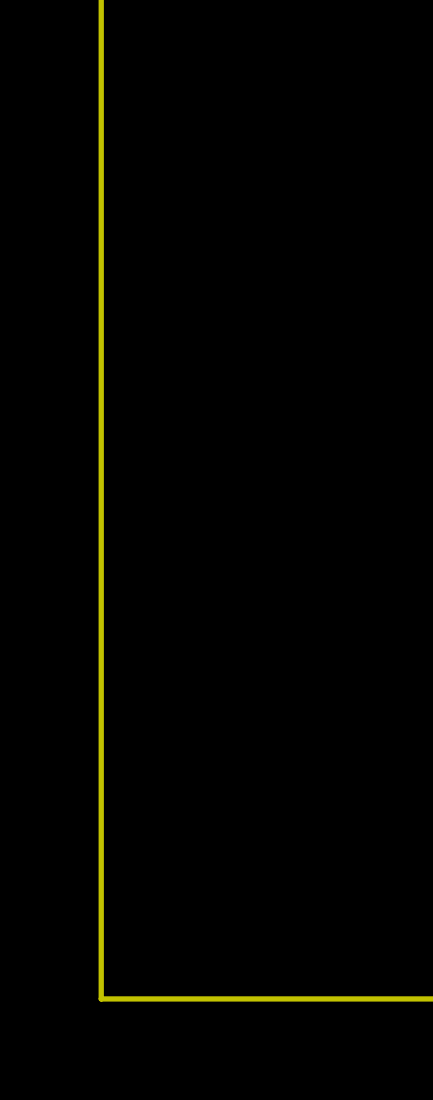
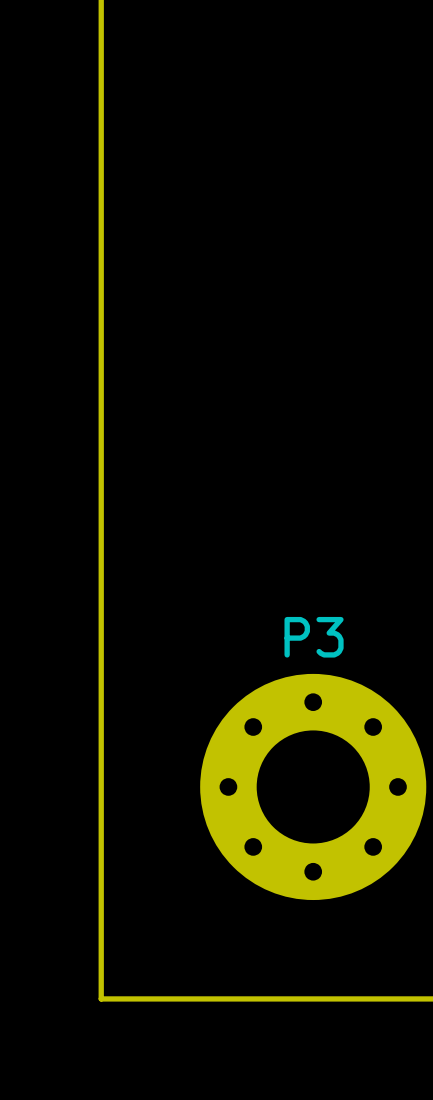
P3: none -> (313, 786)

